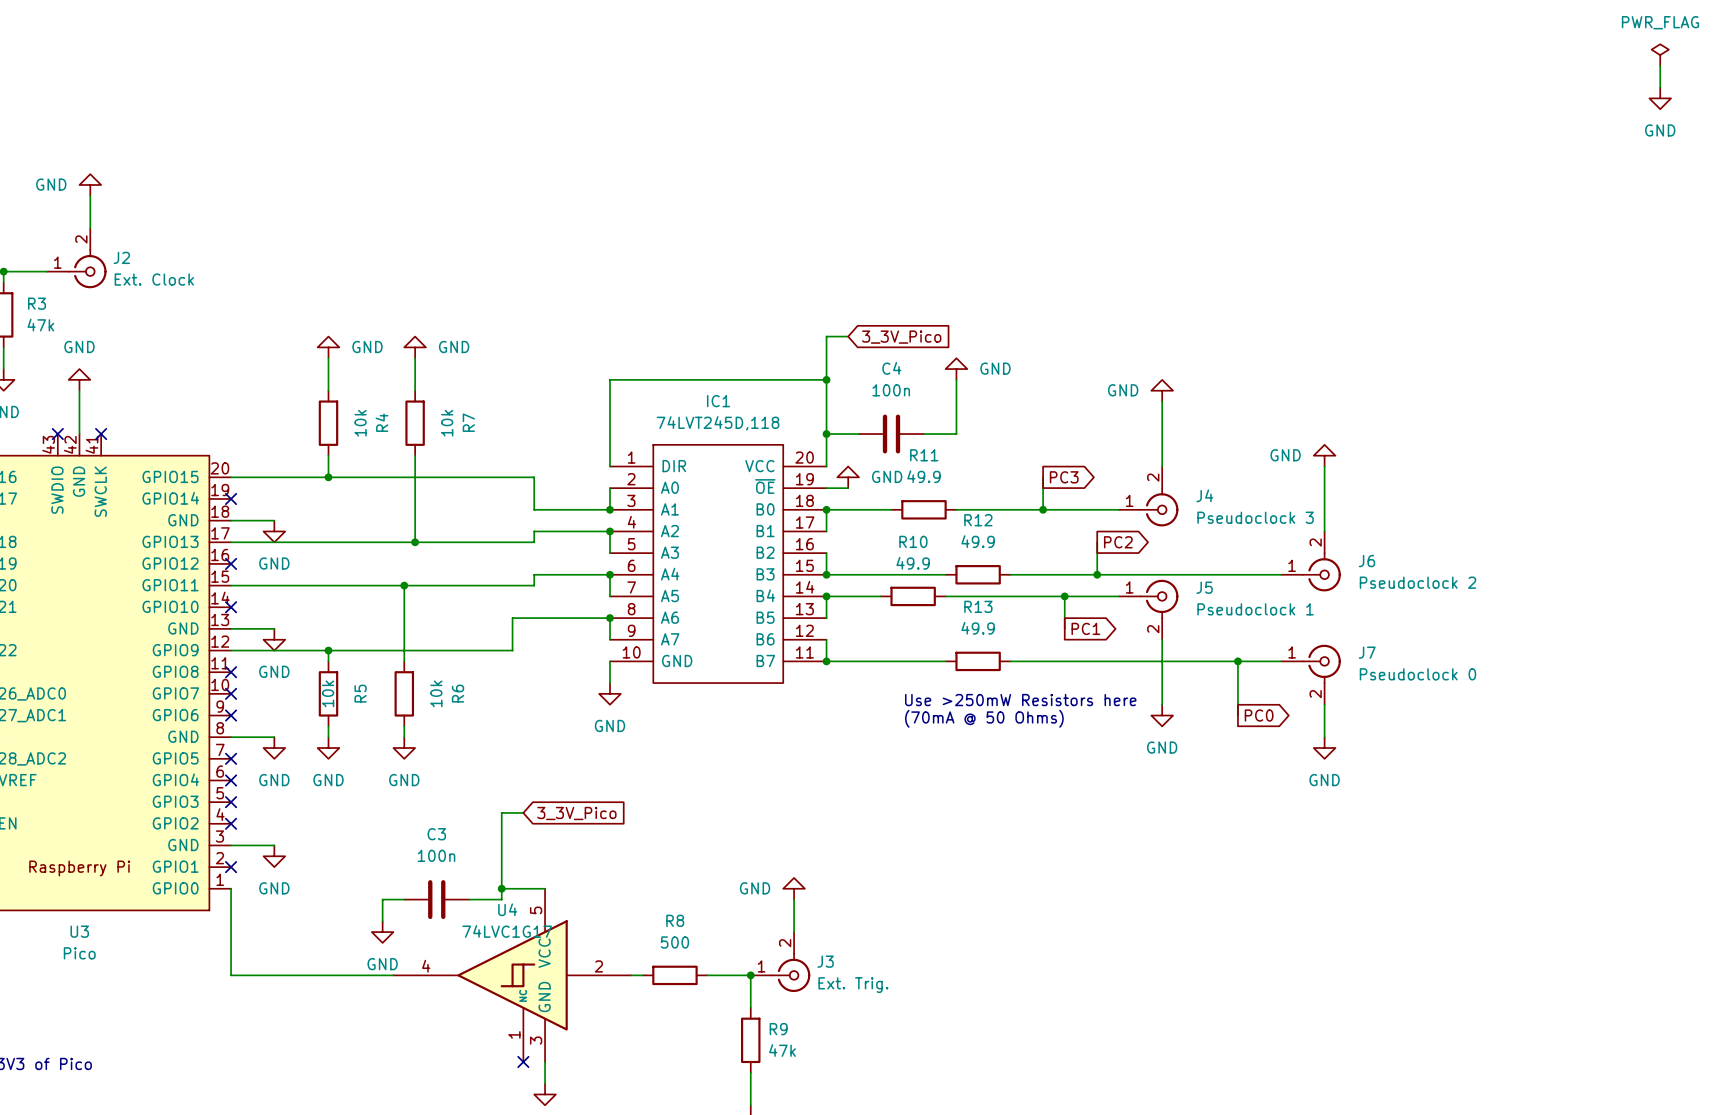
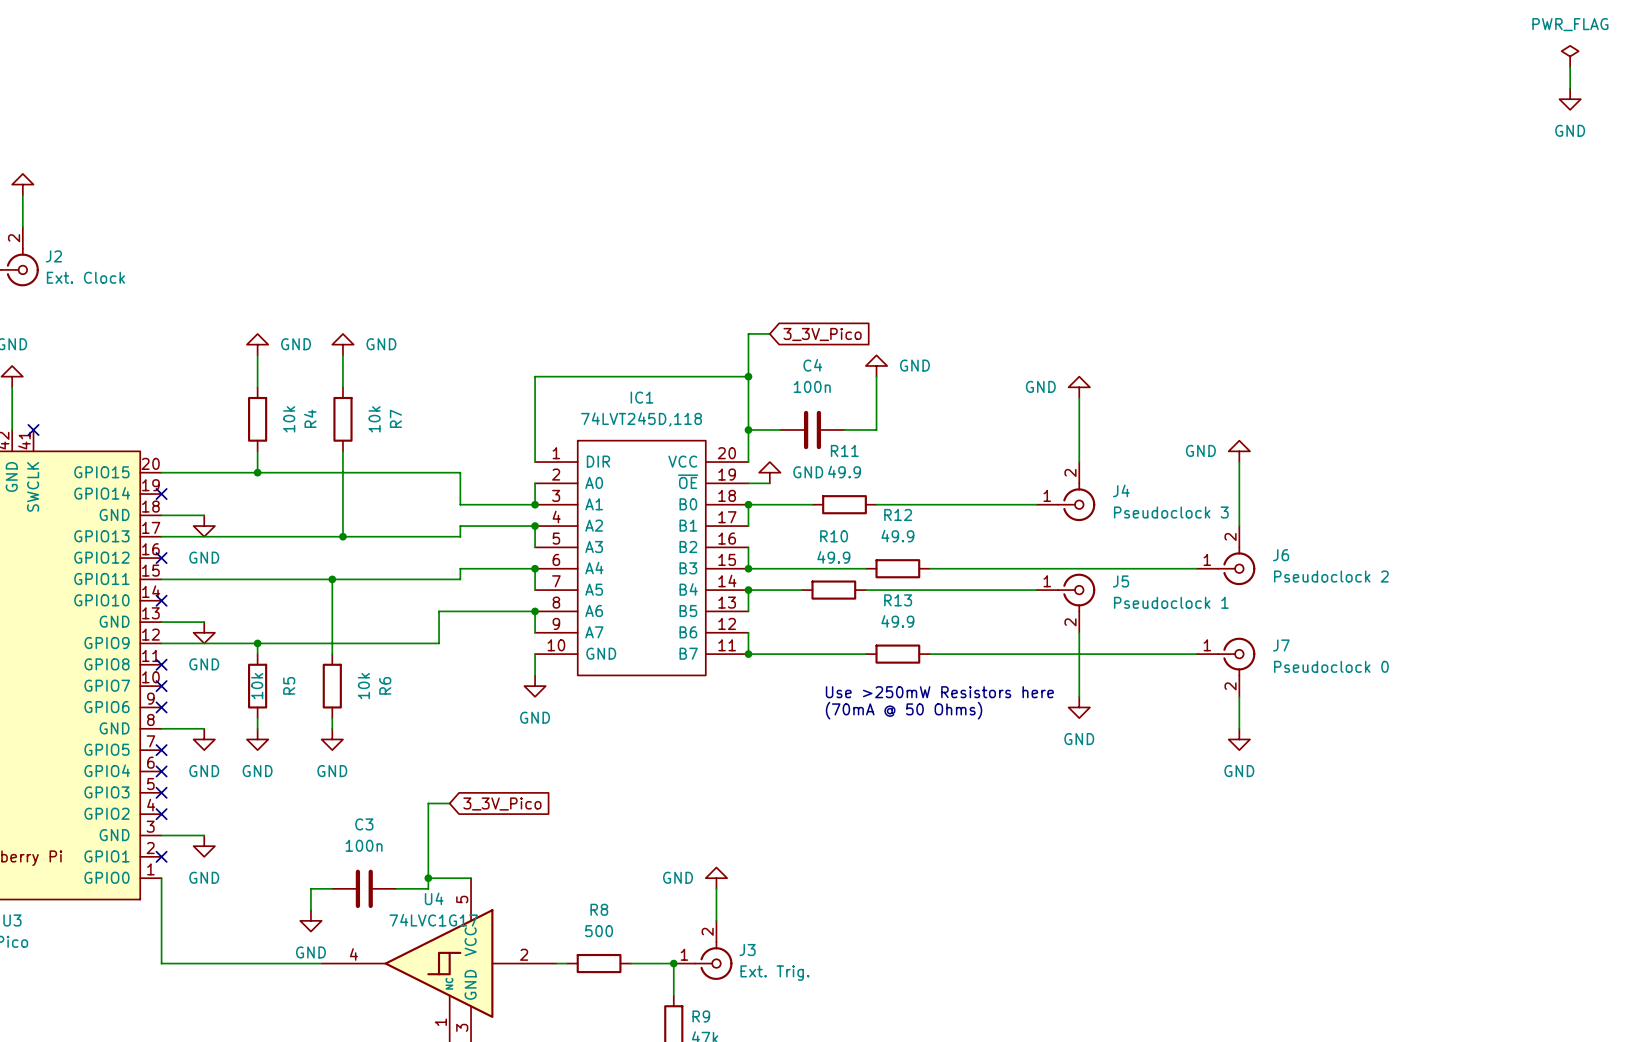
wire: (1043, 477) (1043, 509) -> none
global label: PC3 (1064, 477) -> none
junction: (1043, 509) -> none
wire: (1097, 542) (1097, 574) -> none
global label: PC2 (1118, 542) -> none
junction: (1097, 574) -> none
wire: (1064, 596) (1064, 628) -> none
junction: (1064, 596) -> none
global label: PC1 (1085, 628) -> none
wire: (1237, 661) (1237, 715) -> none
junction: (1237, 661) -> none
global label: PC0 (1259, 715) -> none

